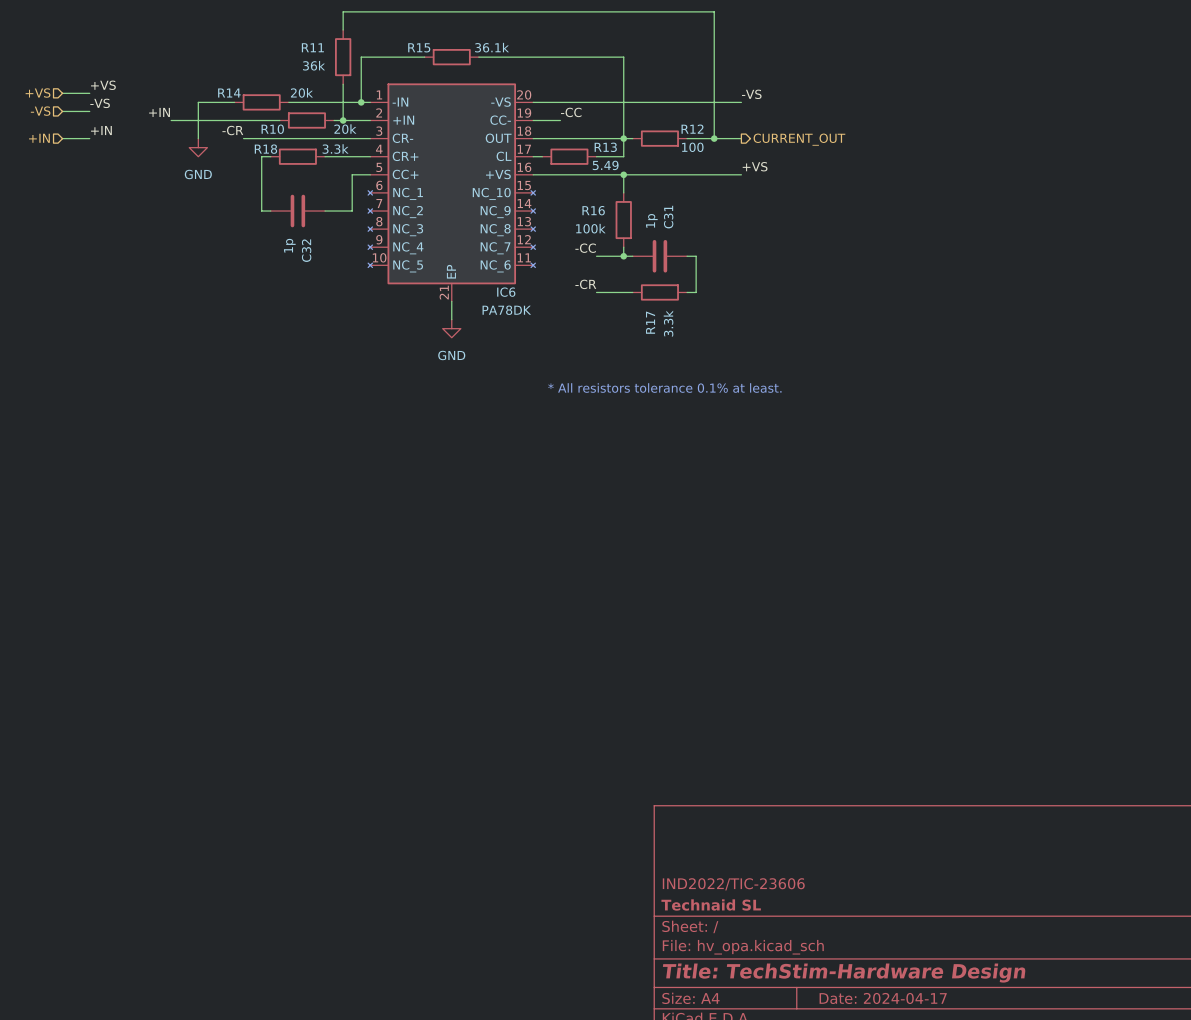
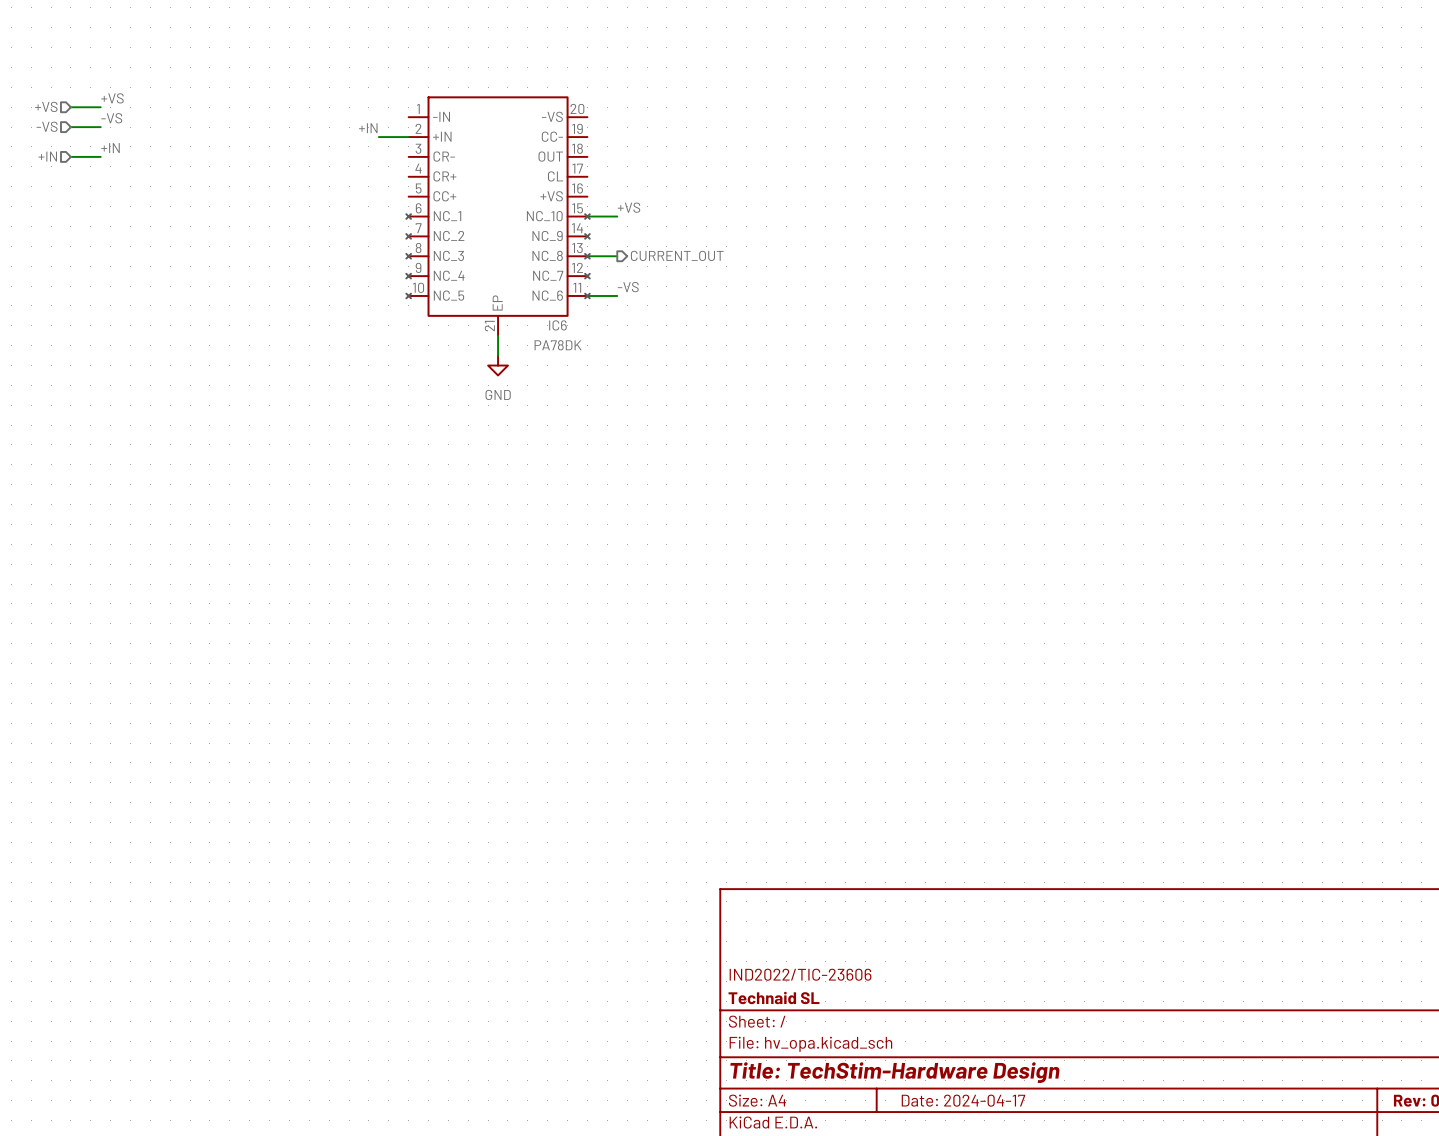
wire: (343, 29) (343, 11) (714, 11) (714, 138) -> none
R11: 36k (343, 57) -> none
wire: (424, 57) (361, 57) (361, 102) -> none
R15: 36.1k (451, 57) -> none
wire: (478, 57) (623, 57) (623, 156) (596, 156) -> none
wire: (343, 84) (343, 120) (334, 120) -> none
label: -VS (751, 94) -> none
wire: (234, 102) (198, 102) (198, 138) -> none
R14: 20k (261, 102) -> none
wire: (288, 102) (370, 102) -> none
junction: (361, 102) -> none
wire: (533, 102) (741, 102) -> none
label position: +IN (159, 112) -> +IN (368, 128)
label: -CC (571, 112) -> none
wire: (171, 120) (279, 120) -> none
R10: 20k (306, 120) -> none
junction: (343, 120) -> none
wire: (533, 120) (560, 120) -> (587, 216) (617, 216)
label: -CR (232, 130) -> none
wire: (243, 138) (370, 138) -> none
wire: (533, 138) (632, 138) -> none
junction: (623, 138) -> none
R12: 100 (659, 138) -> none
wire: (687, 138) (741, 138) -> none
junction: (714, 138) -> none
hierarchical label: CURRENT_OUT (799, 139) -> none
power symbol: GND (198, 147) -> none
wire: (270, 156) (261, 156) (261, 211) (270, 211) -> none
R18: 3.3k (297, 156) -> none
wire: (325, 156) (370, 156) -> none
wire: (533, 156) (542, 156) -> none
R13: 5.49 (569, 156) -> none
label: +VS (755, 166) -> none
wire: (370, 174) (352, 174) (352, 211) (325, 211) -> none
wire: (533, 174) (741, 174) -> none
wire: (623, 174) (623, 192) -> none
junction: (623, 174) -> none
label: none -> +VS (629, 207)
C32: 1p (297, 211) -> none
R16: 100k (623, 220) -> none
wire: none -> (587, 256) (617, 256)
hierarchical label: none -> CURRENT_OUT (677, 255)
wire: (623, 247) (623, 256) -> none
label: -CC (585, 248) -> none
wire: (596, 256) (632, 256) -> none
junction: (623, 256) -> none
C31: 1p (659, 256) -> none
wire: (687, 256) (696, 256) (696, 292) (687, 292) -> none
label: none -> -VS (628, 287)
wire: none -> (587, 295) (617, 295)
label: -CR (585, 284) -> none
wire: (596, 292) (632, 292) -> none
R17: 3.3k (659, 292) -> none
text: * All resistors tolerance 0.1% at least. (664, 387) -> none

